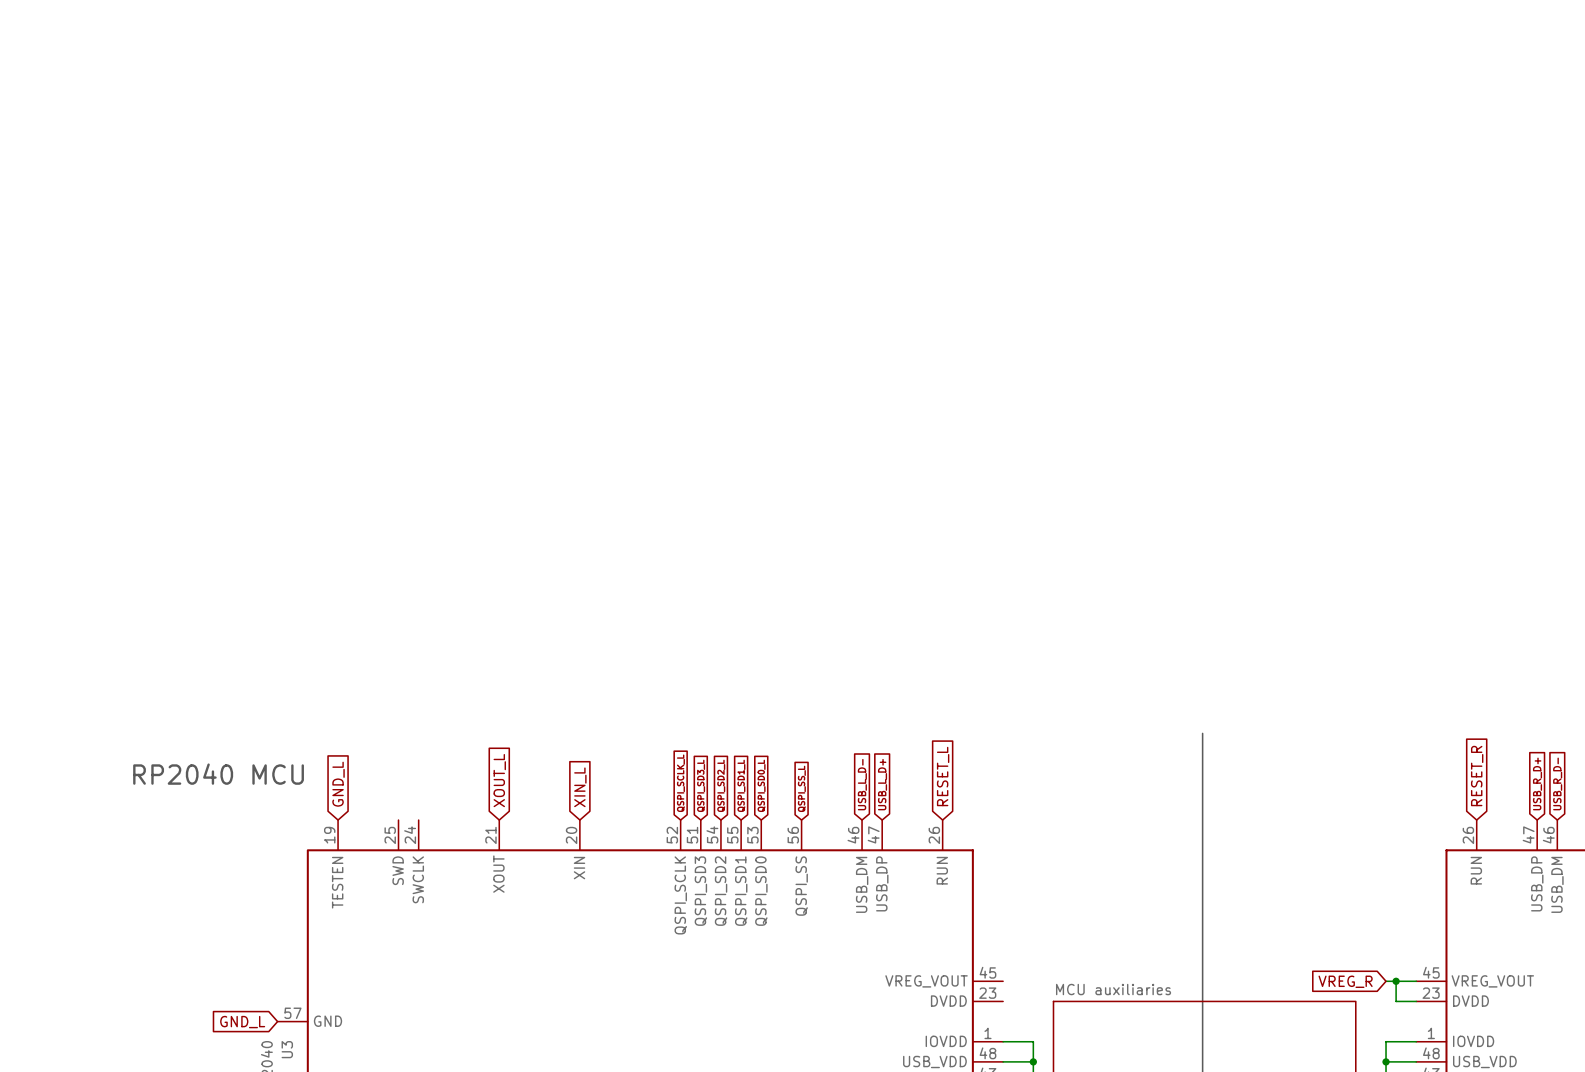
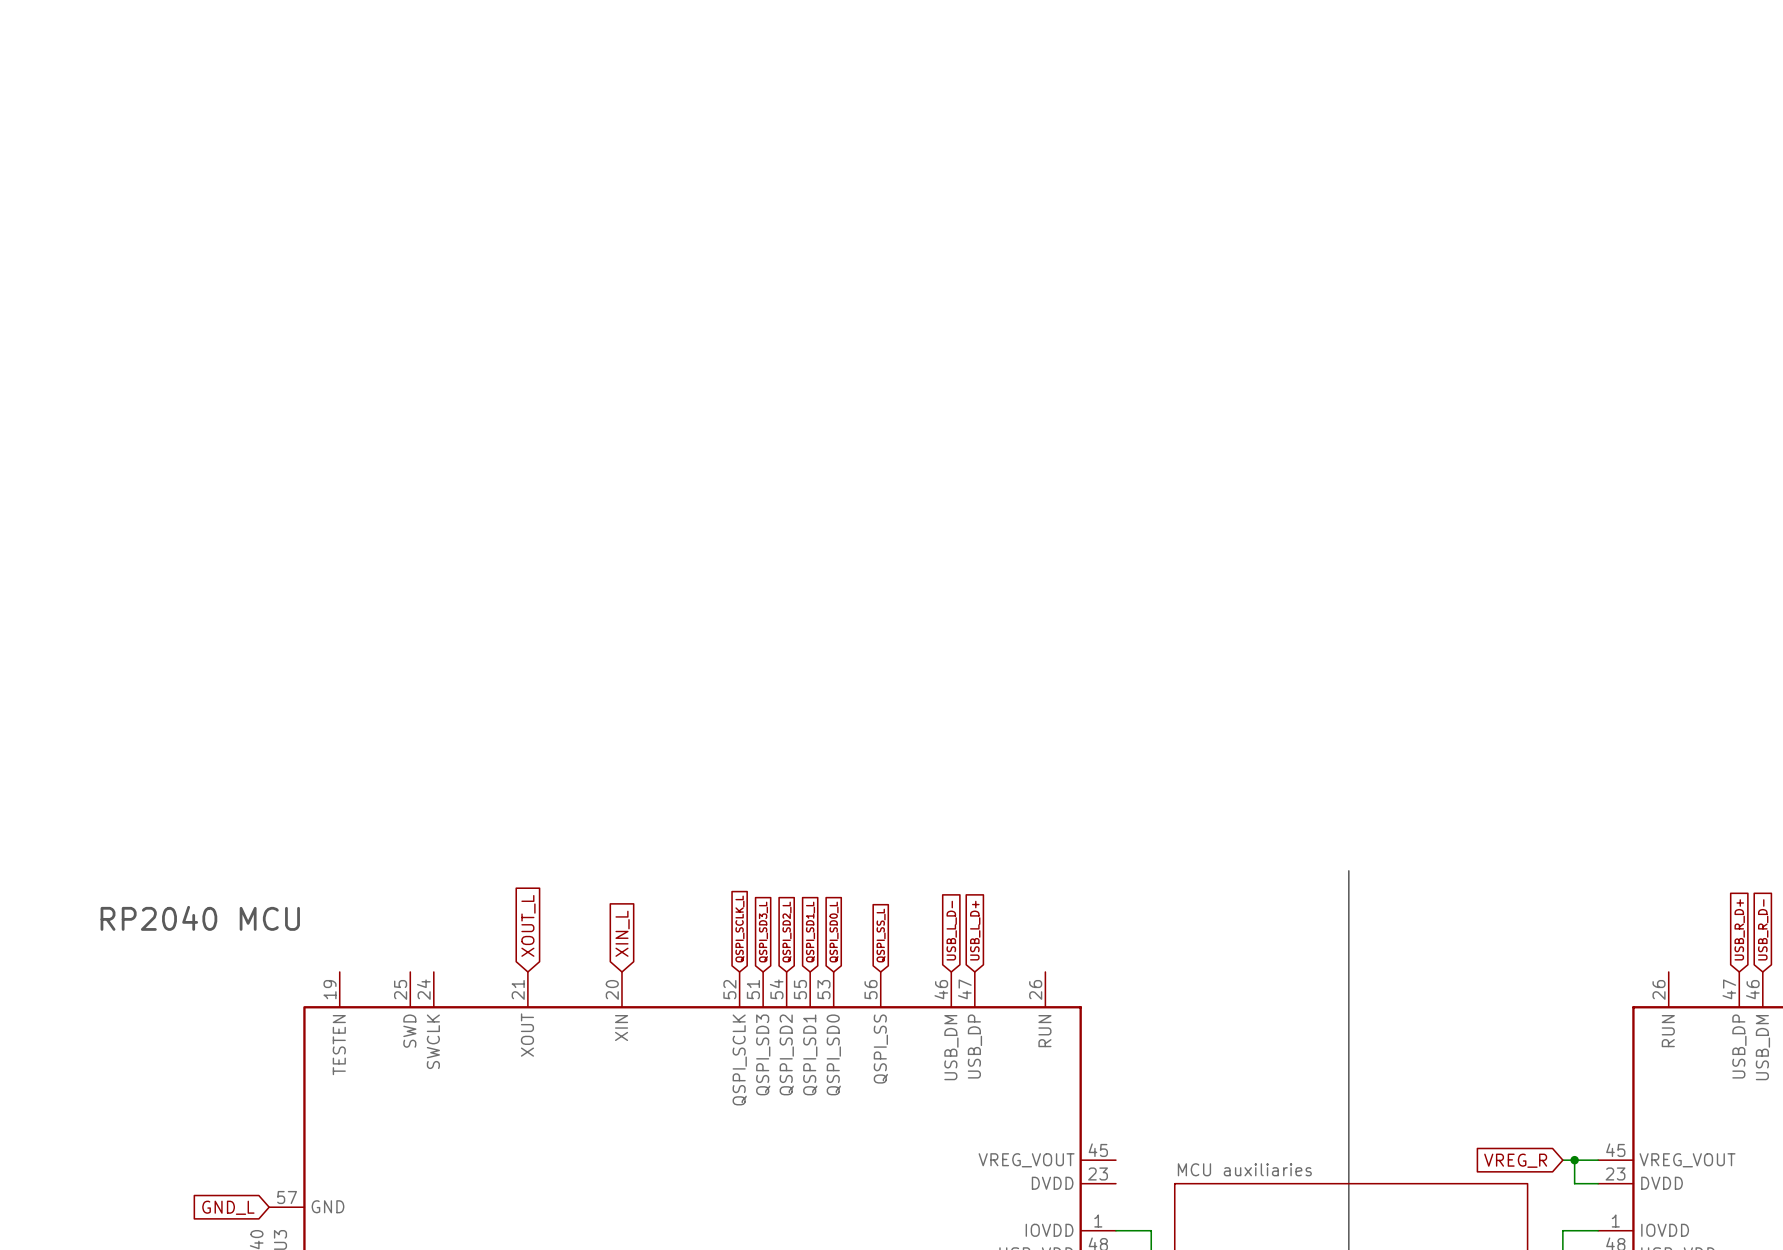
global label: RESET_L (943, 776) -> none
global label: RESET_R (1477, 776) -> none
global label: GND_L (338, 784) -> none

